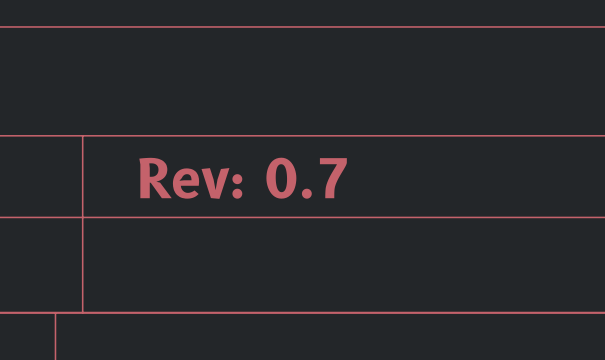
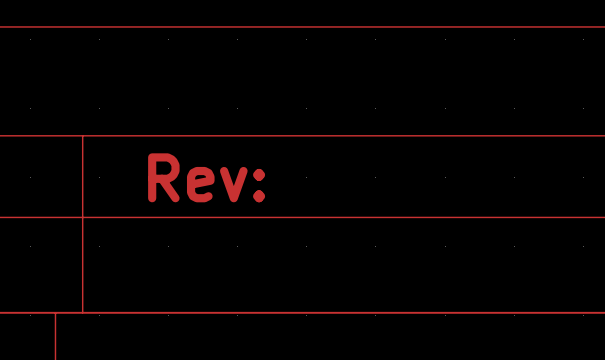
title block: Rev: 0.7 (243, 178) -> Rev: (206, 177)

